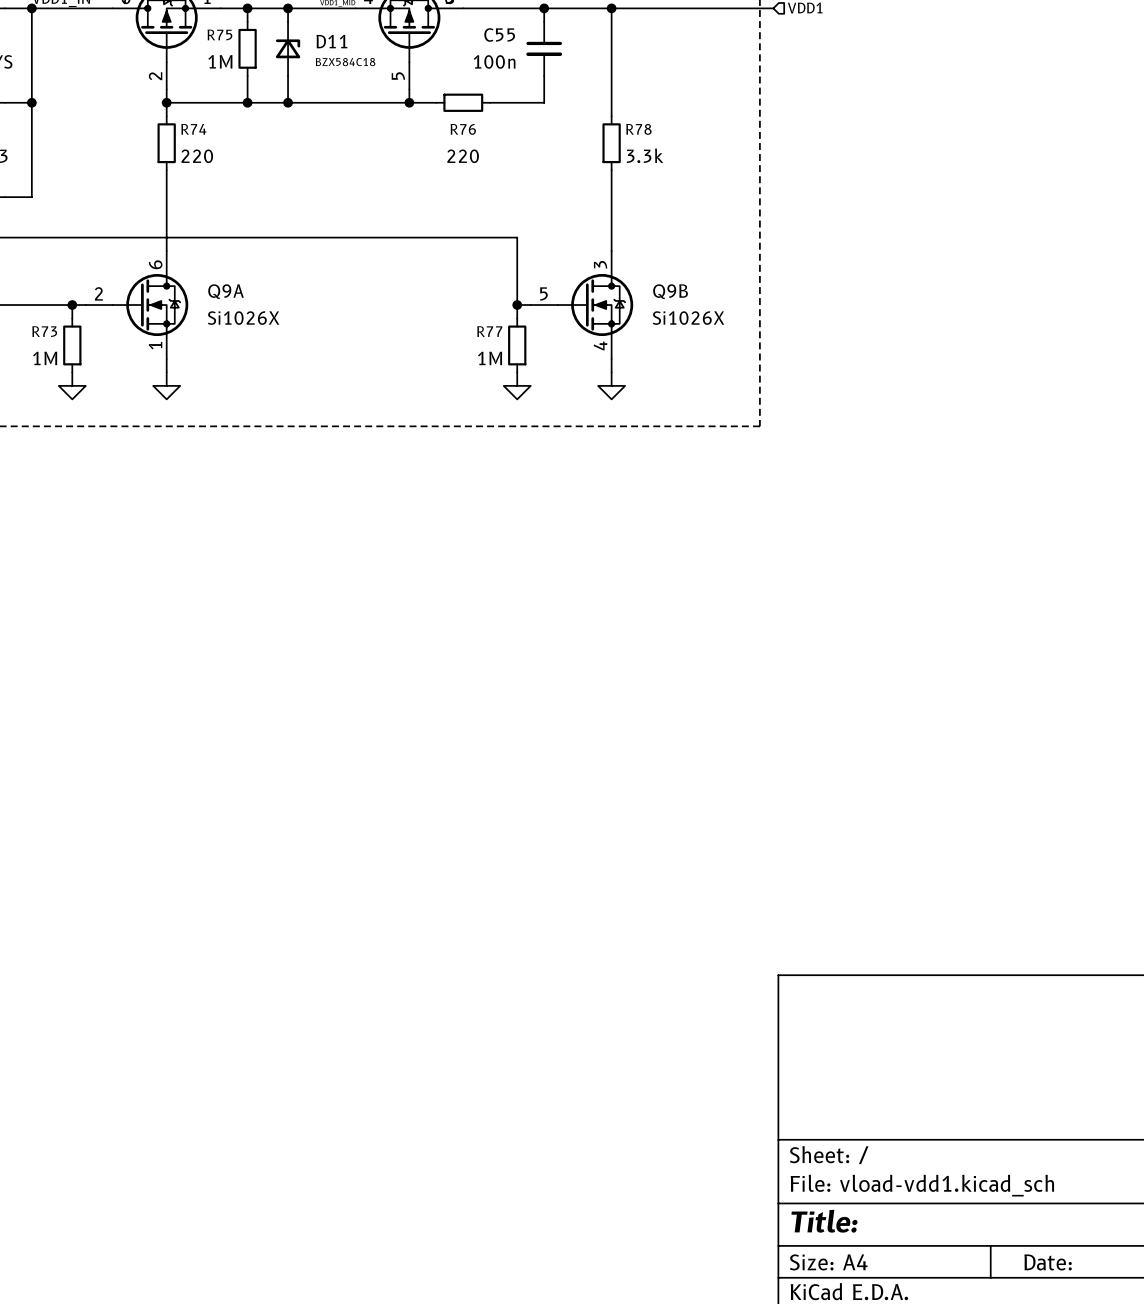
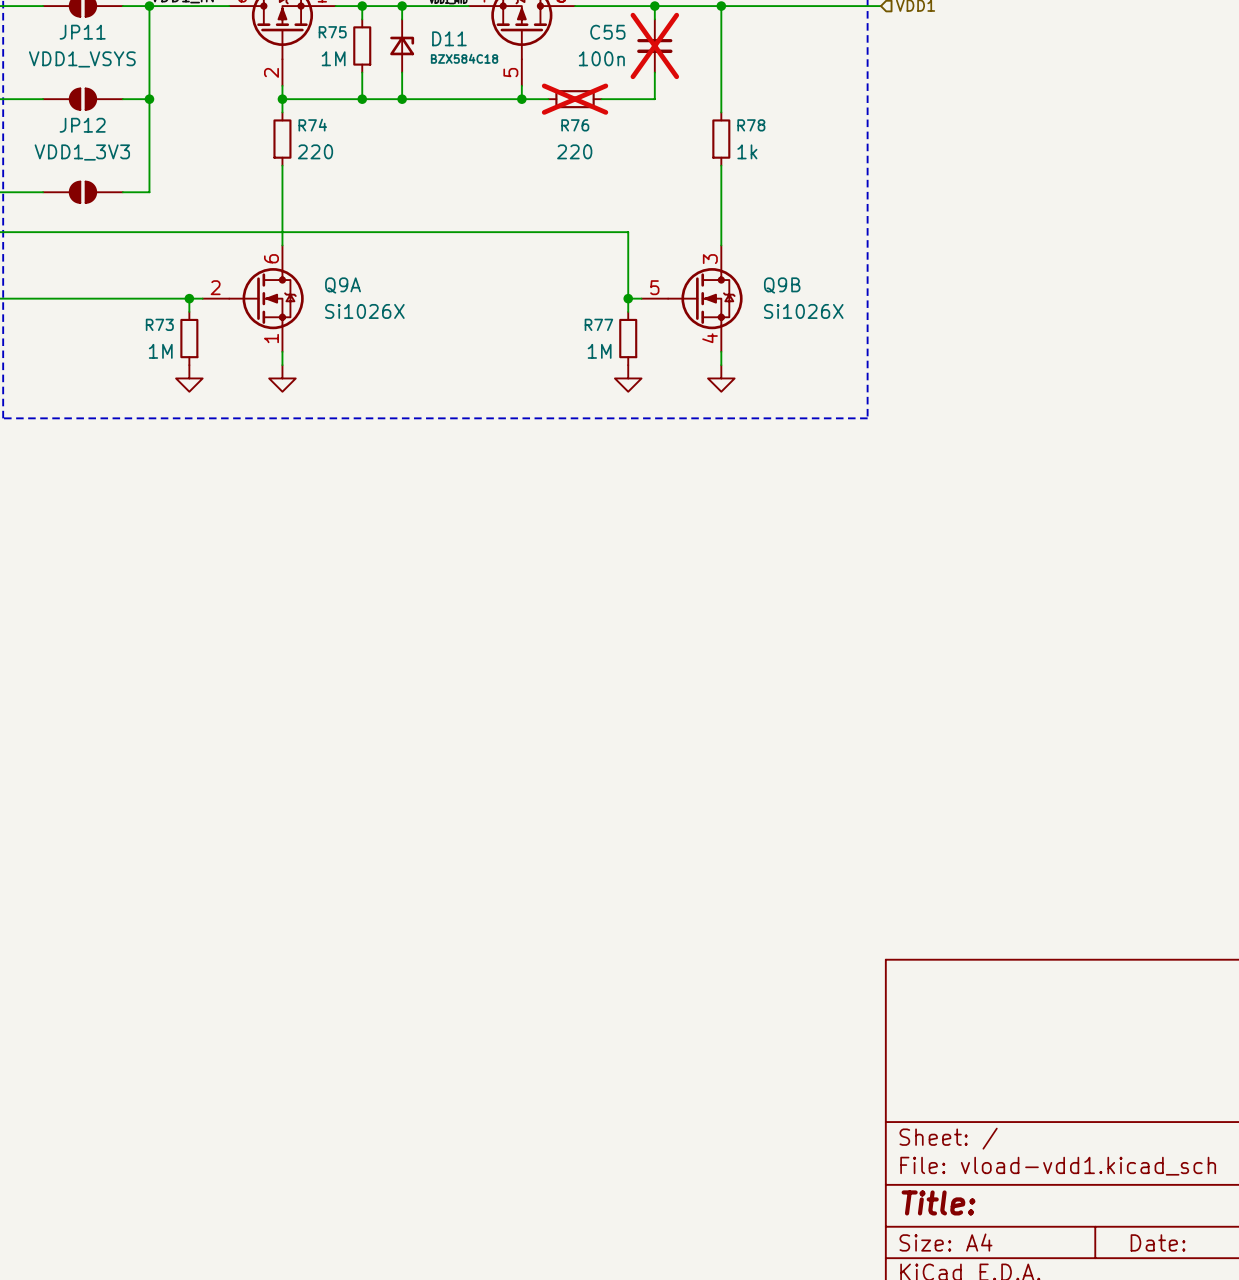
C55 do-not-place cross: none -> (654, 45)
R76 do-not-place cross: none -> (575, 99)
R78 value: 3.3k (645, 155) -> 1k (747, 151)

